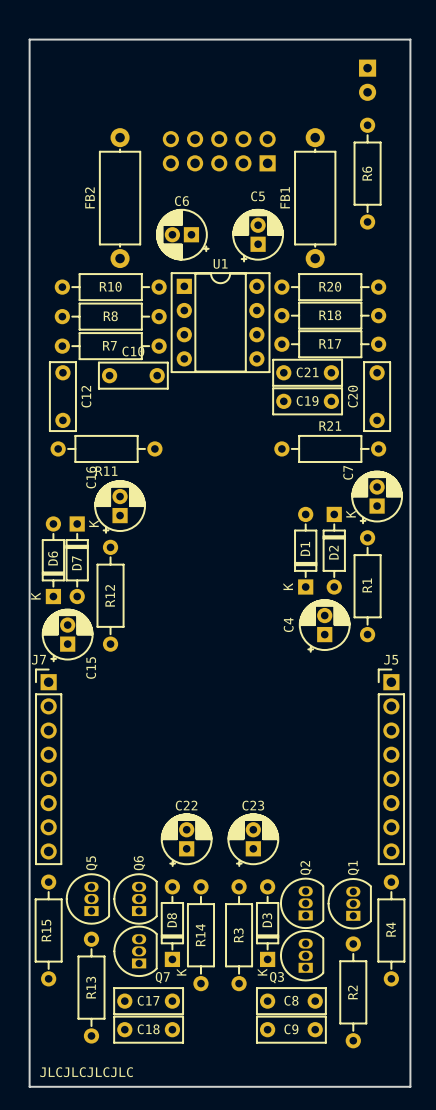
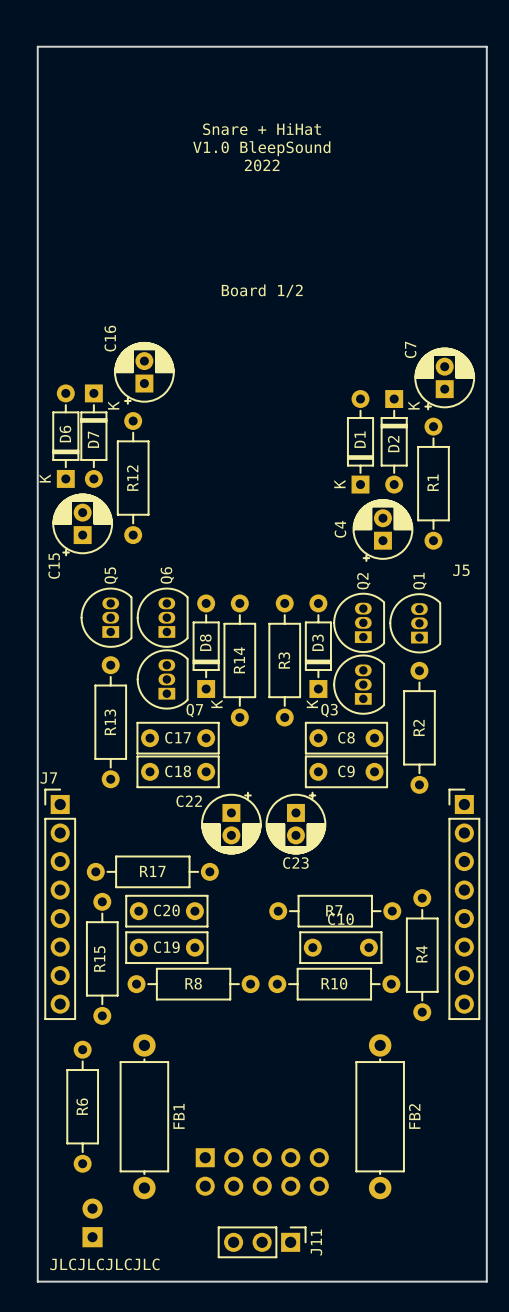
part: (367, 80) -> none
text: none -> Snare + HiHat (262, 129)
text: none -> V1.0 BleepSound (261, 148)
text: none -> 2022 (262, 165)
part: (219, 151) -> none
R6 position: (367, 173) -> (82, 1106)
FB2 name position: FB2 (89, 197) -> FB2 (414, 1116)
FB1 name position: FB1 (285, 197) -> FB1 (179, 1116)
FB2 position: (120, 198) -> (380, 1116)
FB1 position: (315, 198) -> (144, 1116)
C6: (182, 234) -> none
C5: (258, 235) -> none
text: none -> Board 1/2 (262, 290)
R10 position: (110, 287) -> (334, 984)
R20: (330, 287) -> none
R18: (330, 315) -> none
R8 position: (110, 316) -> (193, 984)
U1: (220, 322) -> none
R17 position: (330, 344) -> (152, 871)
R7 position: (110, 346) -> (335, 911)
C21: (307, 372) -> none
C10 position: (133, 375) -> (340, 947)
C12: (62, 396) -> none
C20 name position: C20 (352, 396) -> C20 (166, 910)
C20 rotation: 0° (377, 396) -> 90° clockwise (166, 911)
C20 position: (377, 396) -> (166, 911)
C19 position: (307, 401) -> (166, 947)
R11: (106, 448) -> none
R21: (330, 448) -> none
C7 position: (377, 497) -> (444, 378)
C16 position: (120, 506) -> (144, 373)
D2 text position: K (351, 514) -> K (413, 405)
D7 text position: K (93, 523) -> K (113, 405)
D1 position: (305, 550) -> (360, 441)
D2 position: (334, 550) -> (394, 441)
D6 position: (53, 560) -> (65, 436)
D7 position: (77, 560) -> (93, 436)
R1 position: (367, 586) -> (433, 483)
R12 position: (110, 595) -> (133, 478)
C4 position: (324, 625) -> (382, 530)
C15 position: (67, 635) -> (82, 524)
J5 name position: J5 (391, 659) -> J5 (461, 570)
C15 name position: C15 (91, 667) -> C15 (54, 566)
C22 name position: C22 (186, 805) -> C22 (189, 801)
C22 rotation: 0° (186, 840) -> 180° (231, 823)
C22 position: (186, 840) -> (231, 823)
C23 rotation: 0° (253, 840) -> 180° (295, 823)
C23 position: (253, 840) -> (295, 823)
Q5 position: (87, 898) -> (106, 617)
Q6 position: (135, 898) -> (162, 617)
Q2 position: (302, 903) -> (359, 622)
Q1 position: (349, 903) -> (415, 623)
D8 position: (172, 923) -> (206, 646)
D3 position: (267, 923) -> (318, 646)
R15 position: (48, 930) -> (102, 958)
R4 position: (391, 930) -> (422, 955)
R14 position: (200, 935) -> (239, 660)
R3 position: (239, 935) -> (284, 660)
Q7 position: (135, 951) -> (162, 679)
Q3 position: (302, 955) -> (359, 684)
R13 position: (91, 987) -> (110, 722)
R2 position: (353, 992) -> (419, 727)
part: none -> (262, 1171)
C17 position: (148, 1001) -> (178, 738)
C8 position: (291, 1001) -> (346, 738)
C18 position: (148, 1029) -> (178, 771)
C9 position: (291, 1029) -> (346, 771)
part: none -> (92, 1222)
J11: none -> (262, 1242)

